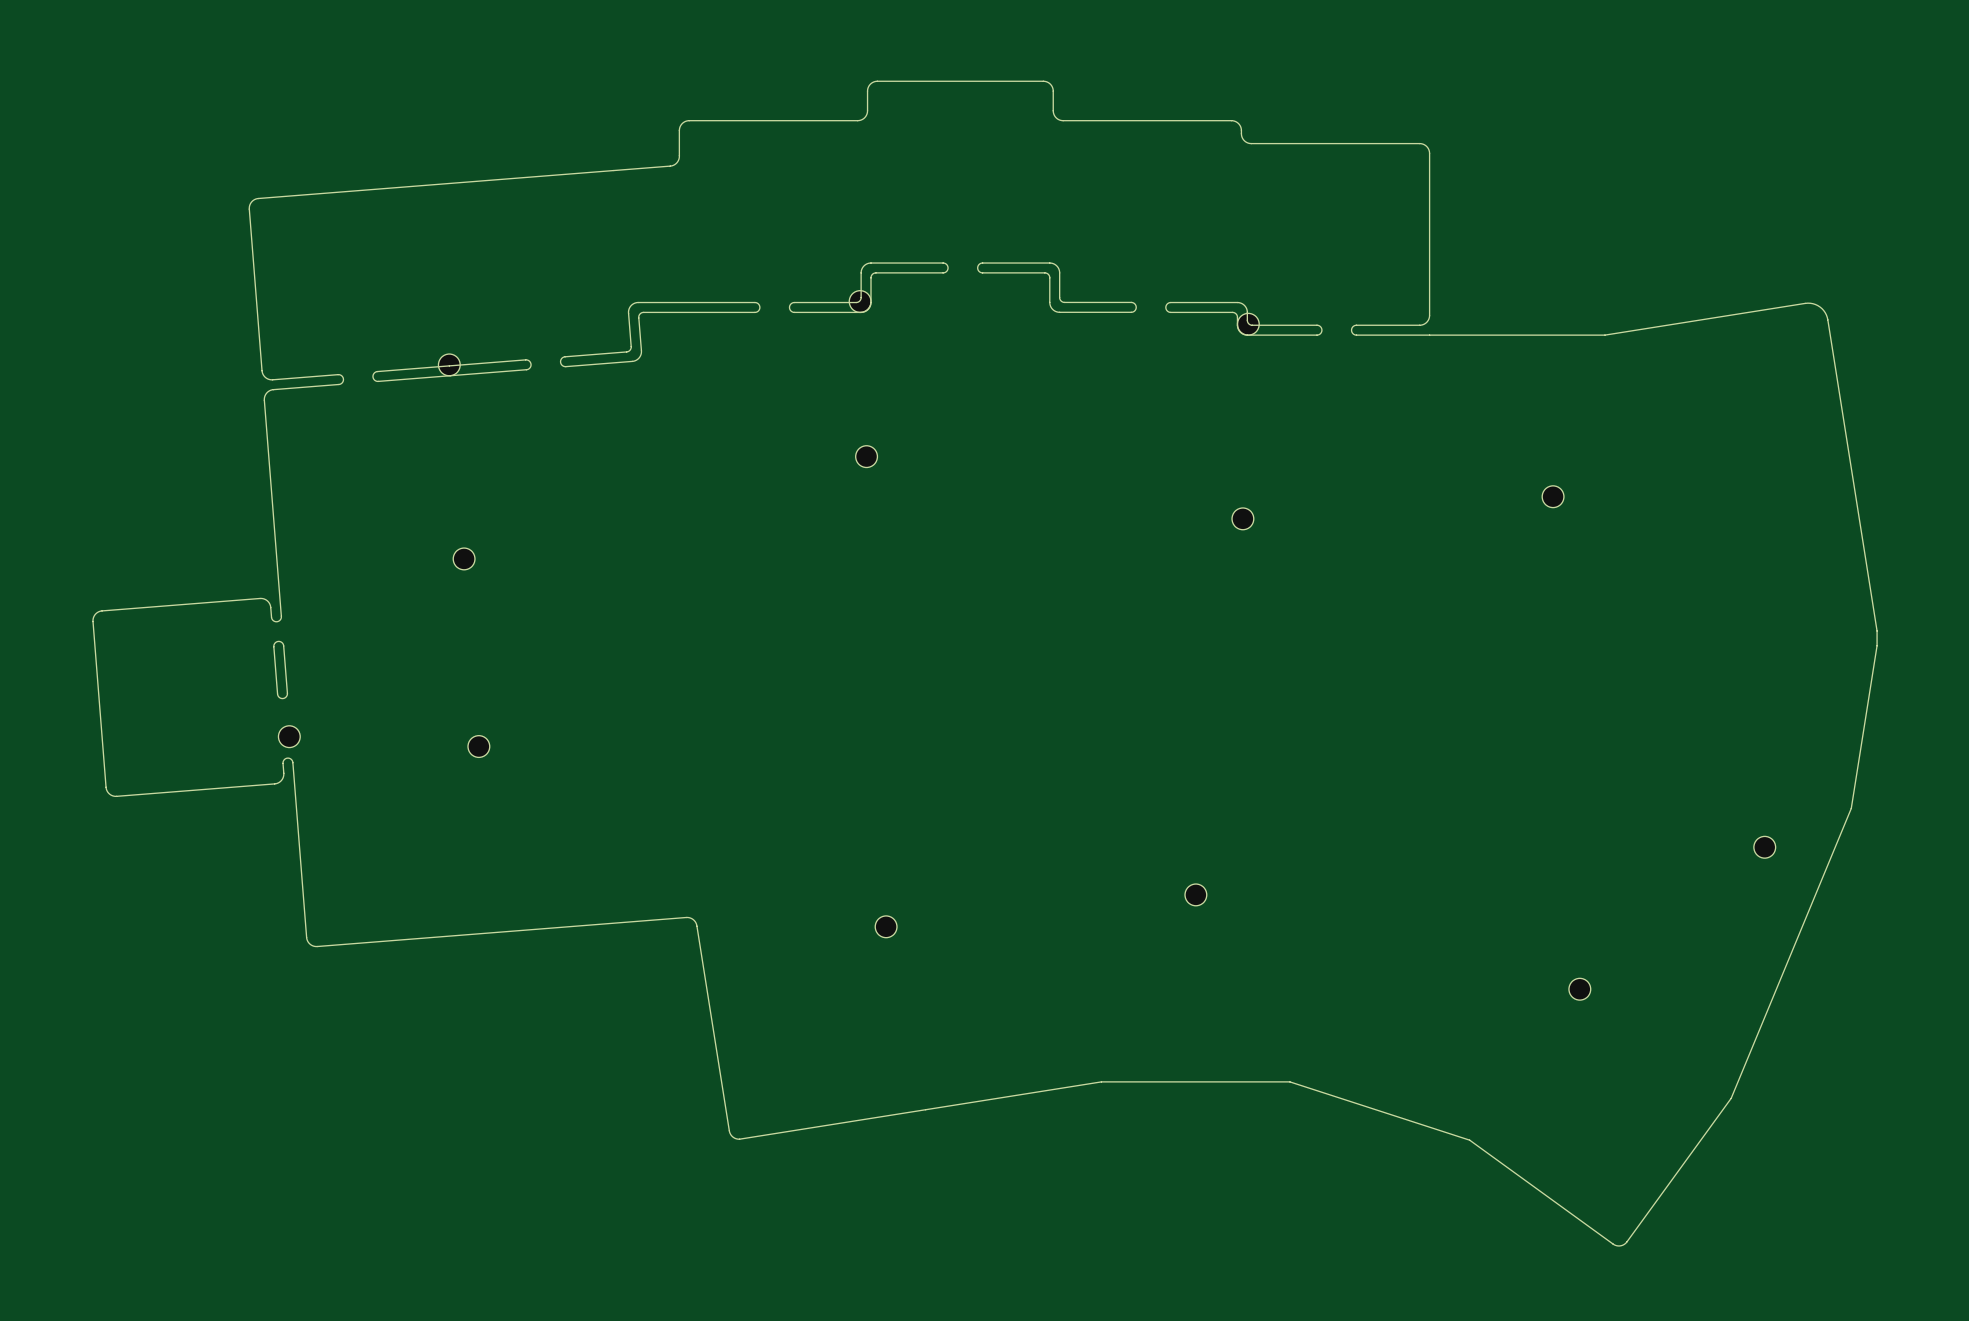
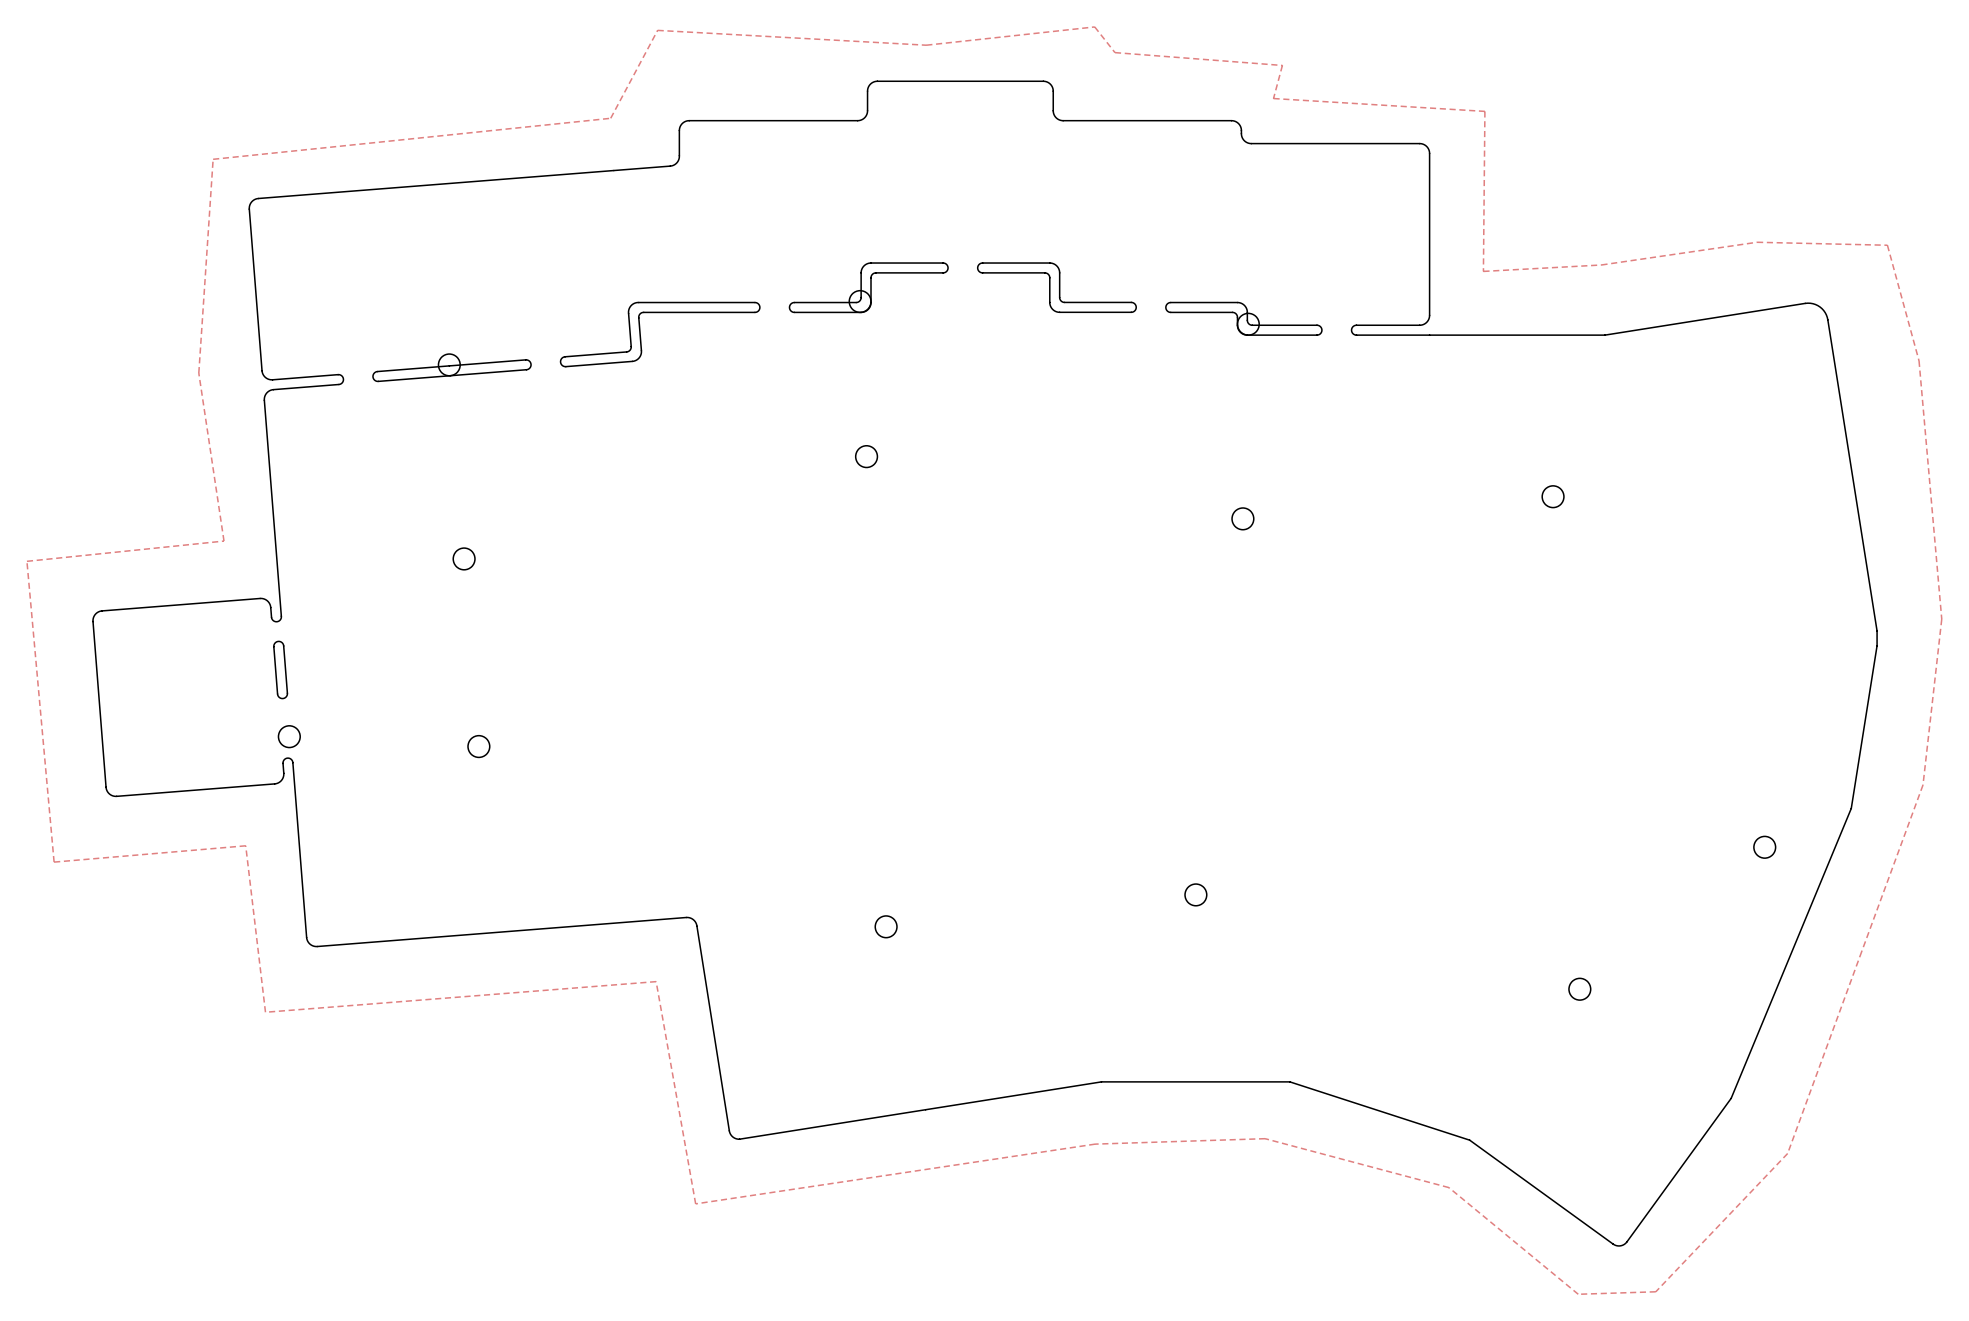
zone outline: none -> (1094, 26) (926, 45) (657, 30) (610, 118) (213, 159) (198, 373) (224, 541) (26, 561) (54, 862) (245, 845) (265, 1012) (656, 981) (695, 1203) (1095, 1144) (1265, 1138) (1448, 1187) (1578, 1294) (1655, 1291) (1787, 1153) (1922, 785) (1941, 619) (1919, 360) (1887, 245) (1757, 242) (1601, 264) (1483, 271) (1484, 111) (1273, 98) (1282, 65) (1114, 52) (1094, 26)

